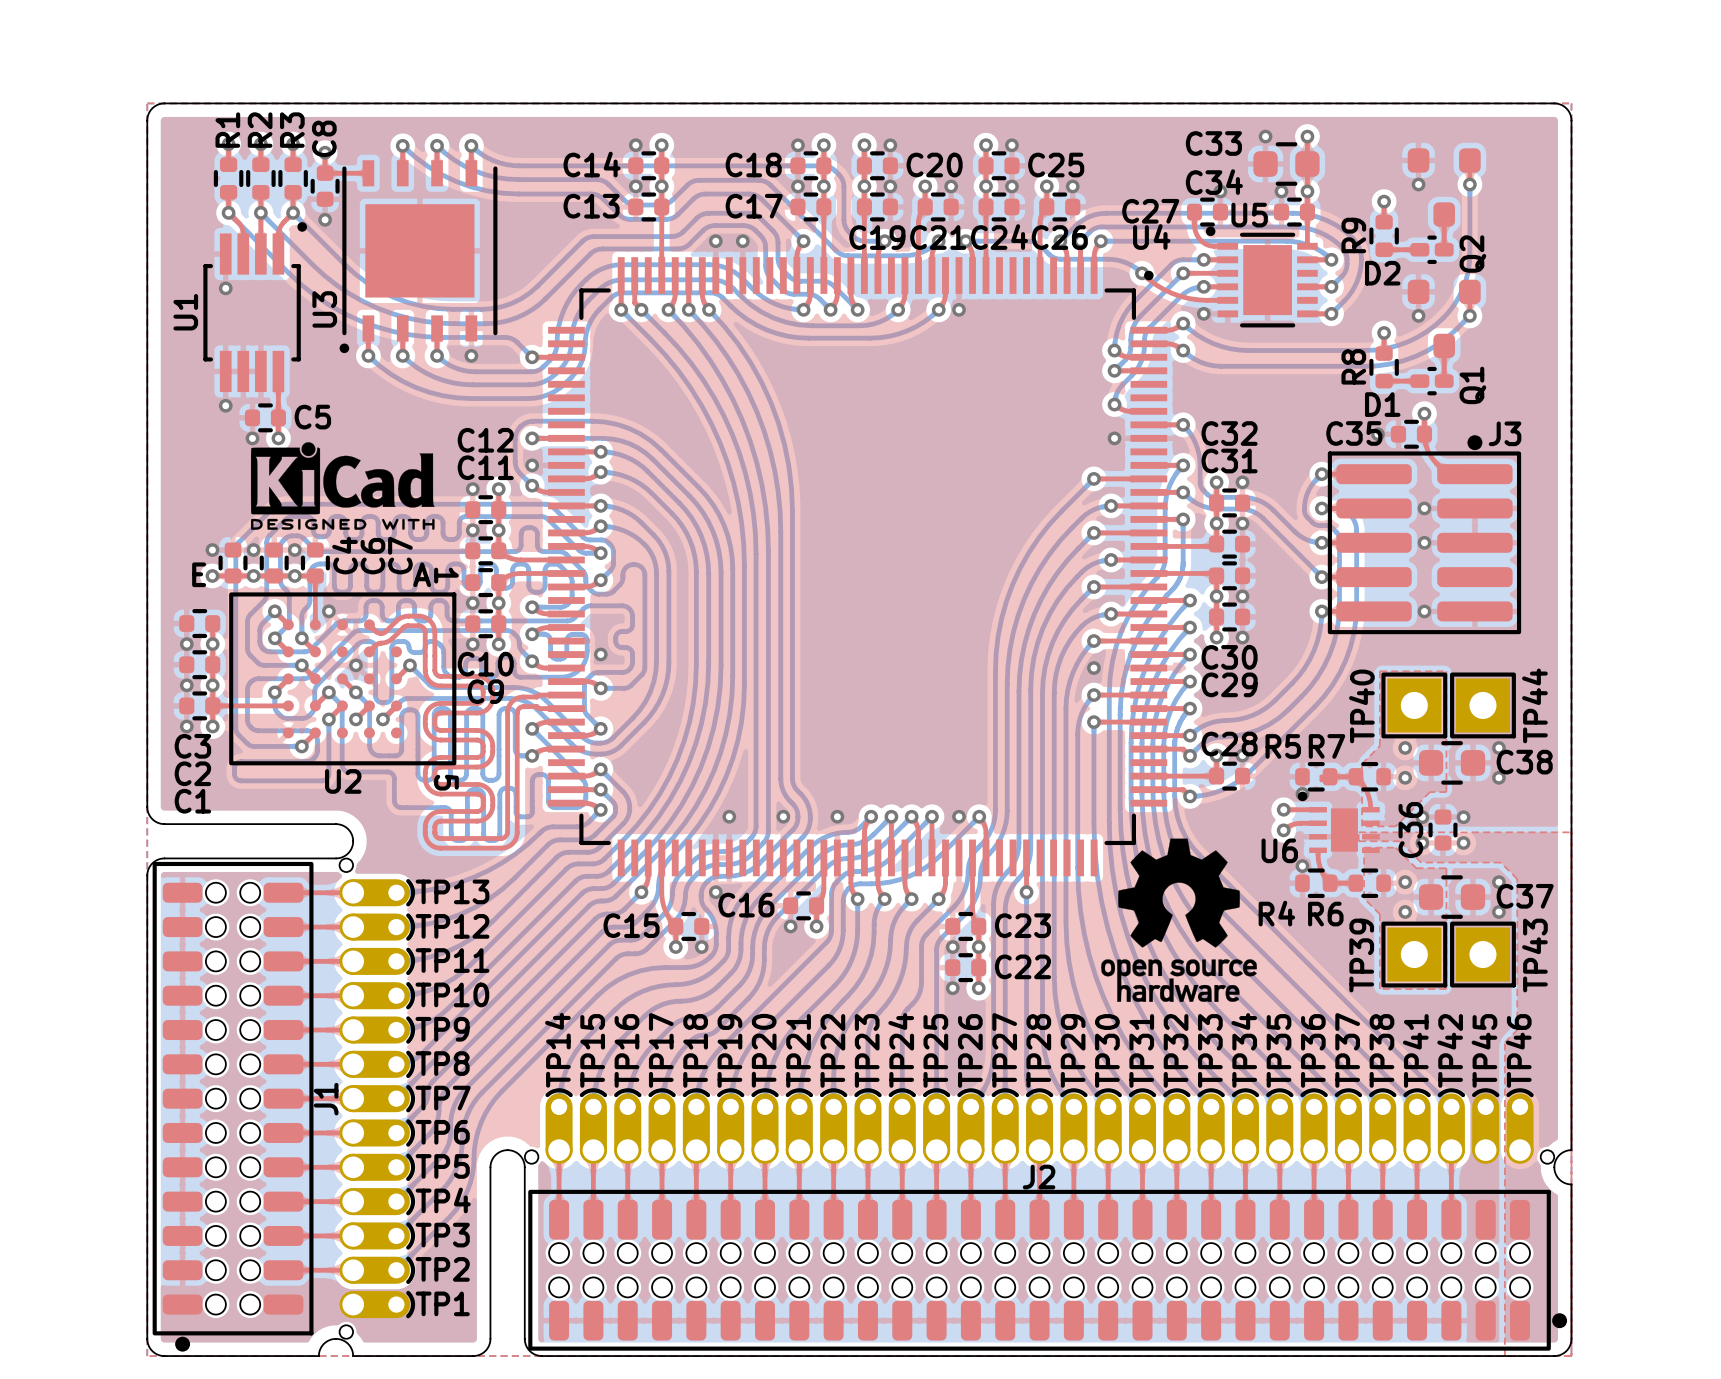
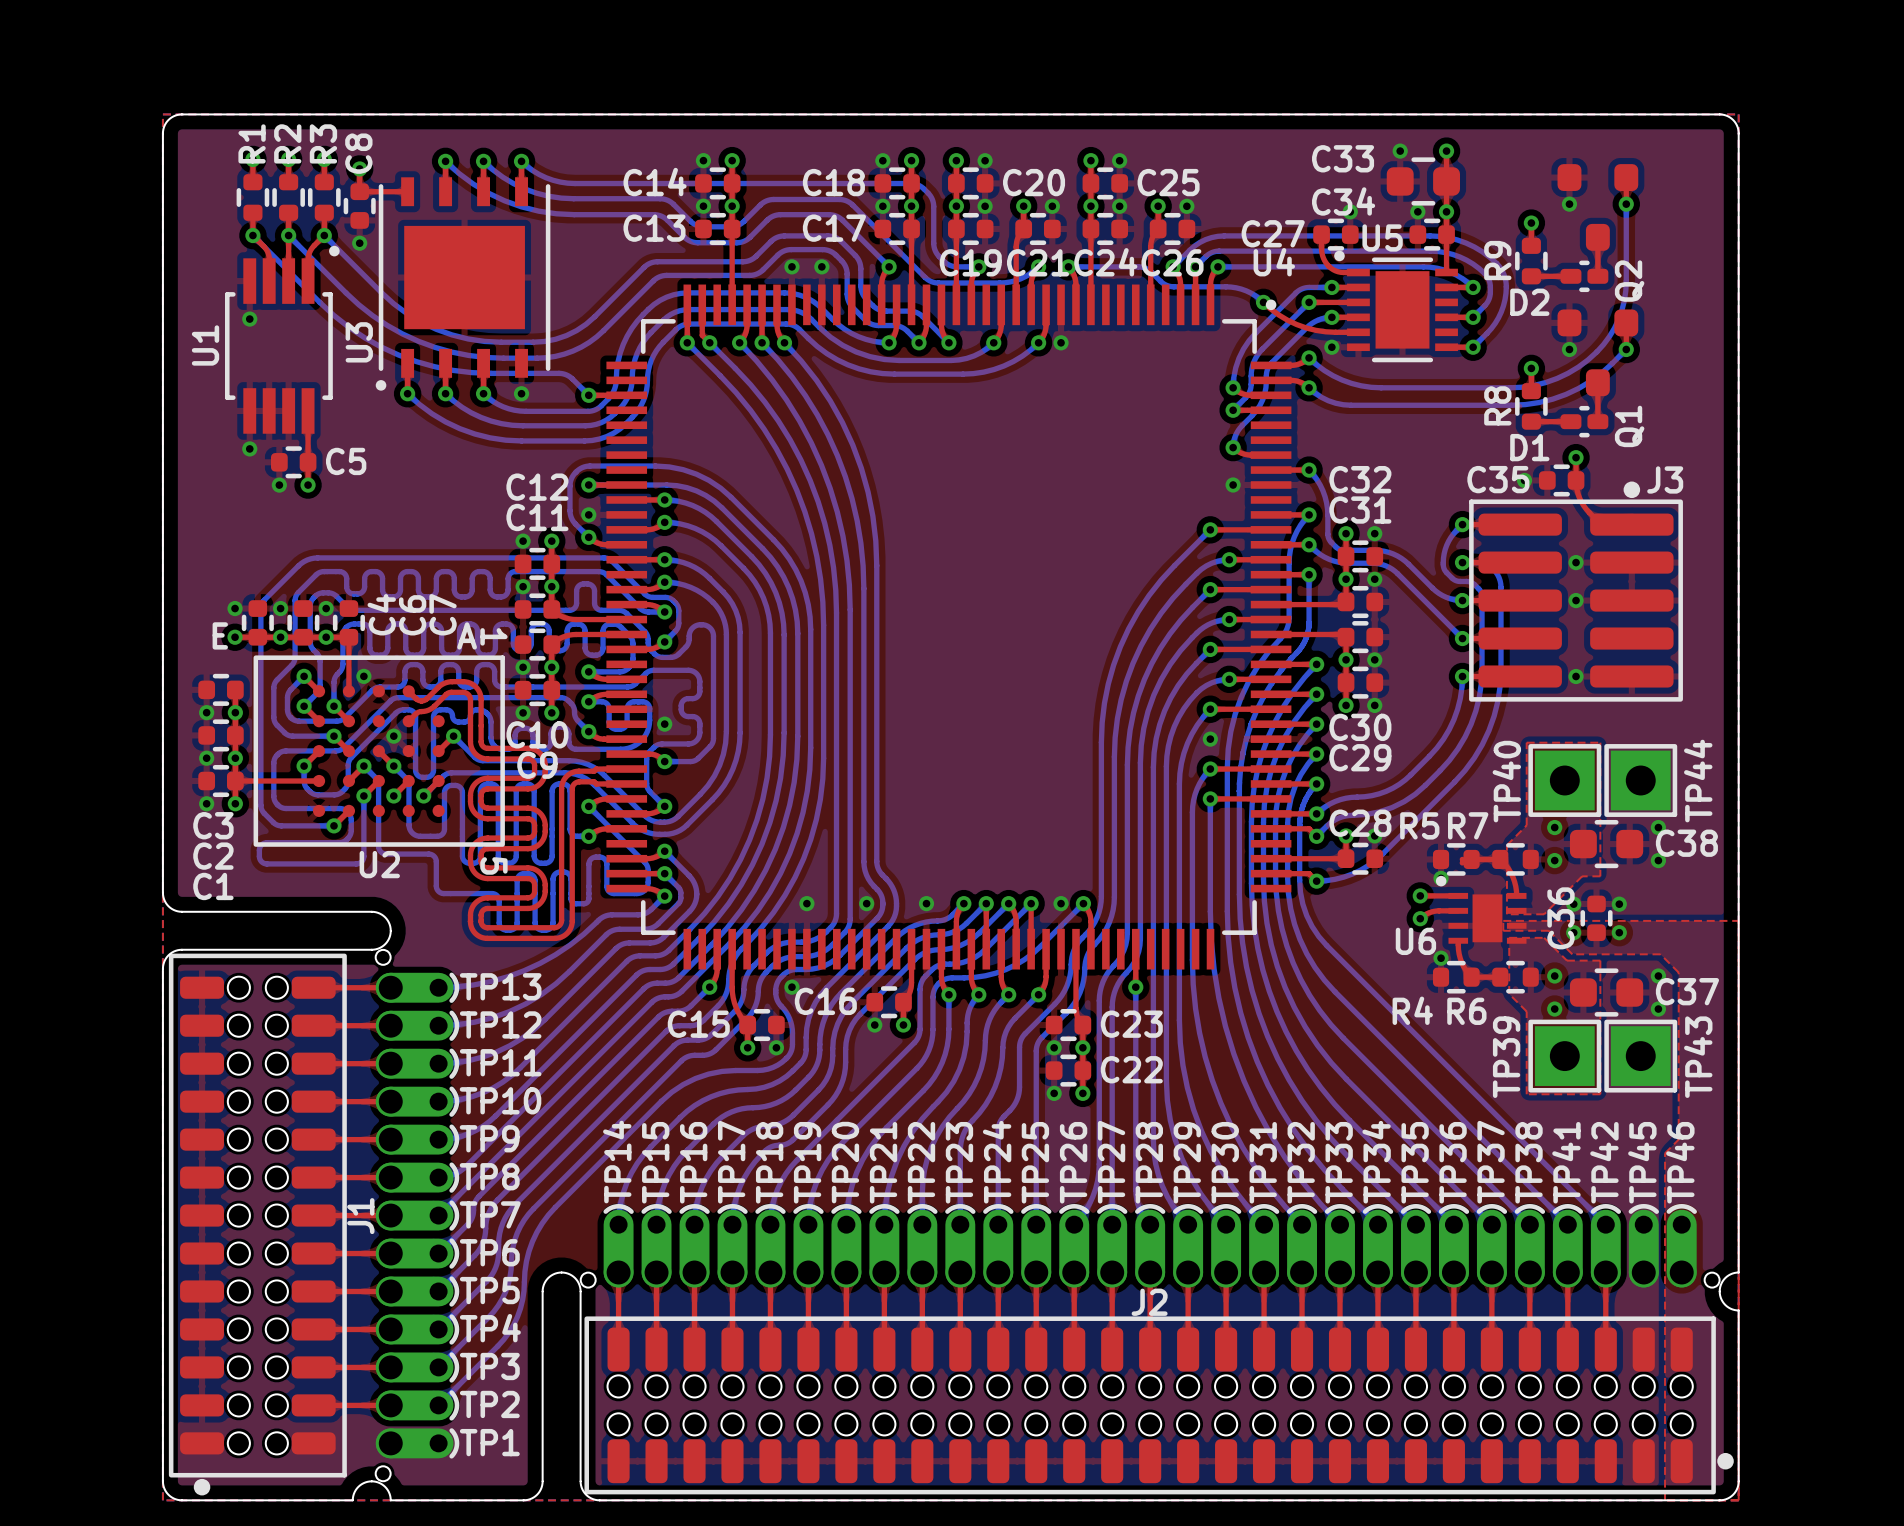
drawing: [250, 442, 435, 530] -> none
drawing: [1101, 838, 1257, 1002] -> none

